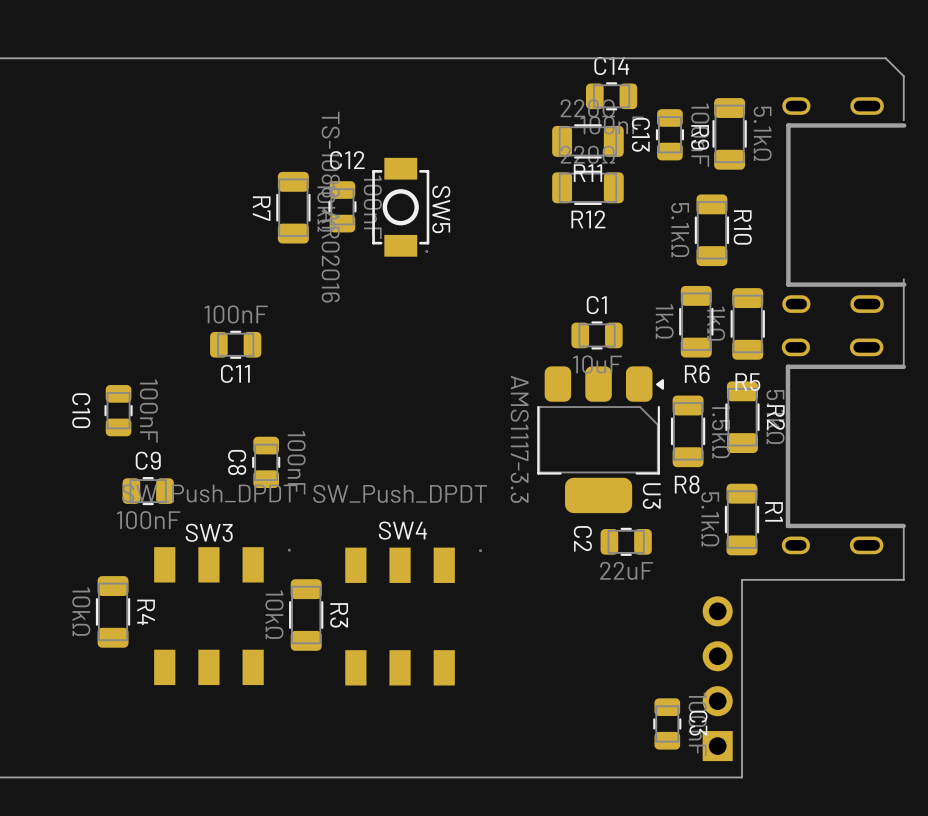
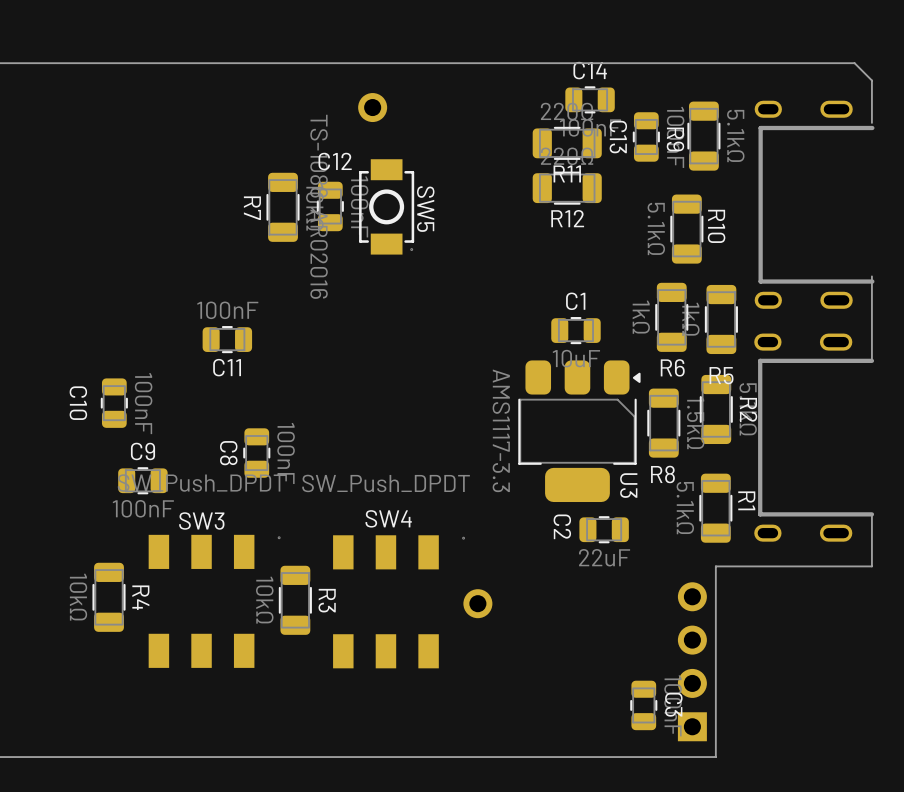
part: none -> (372, 107)
part: none -> (477, 603)

